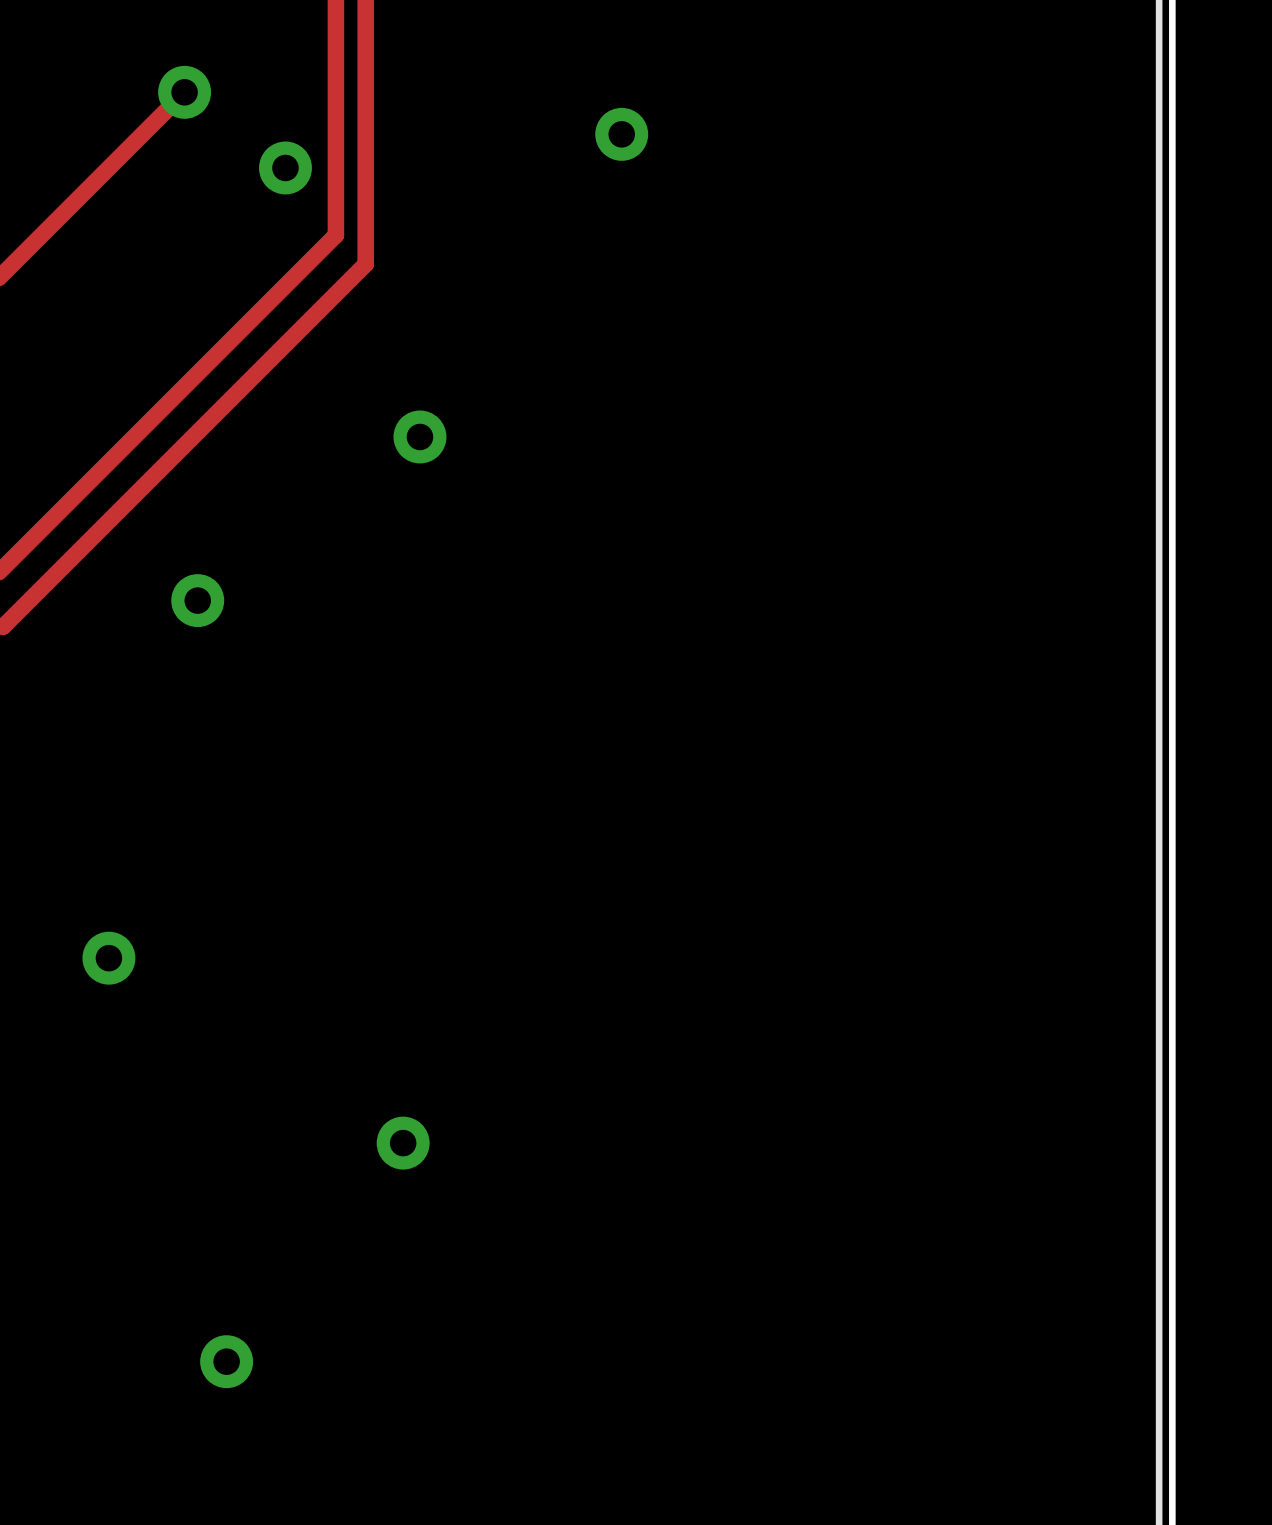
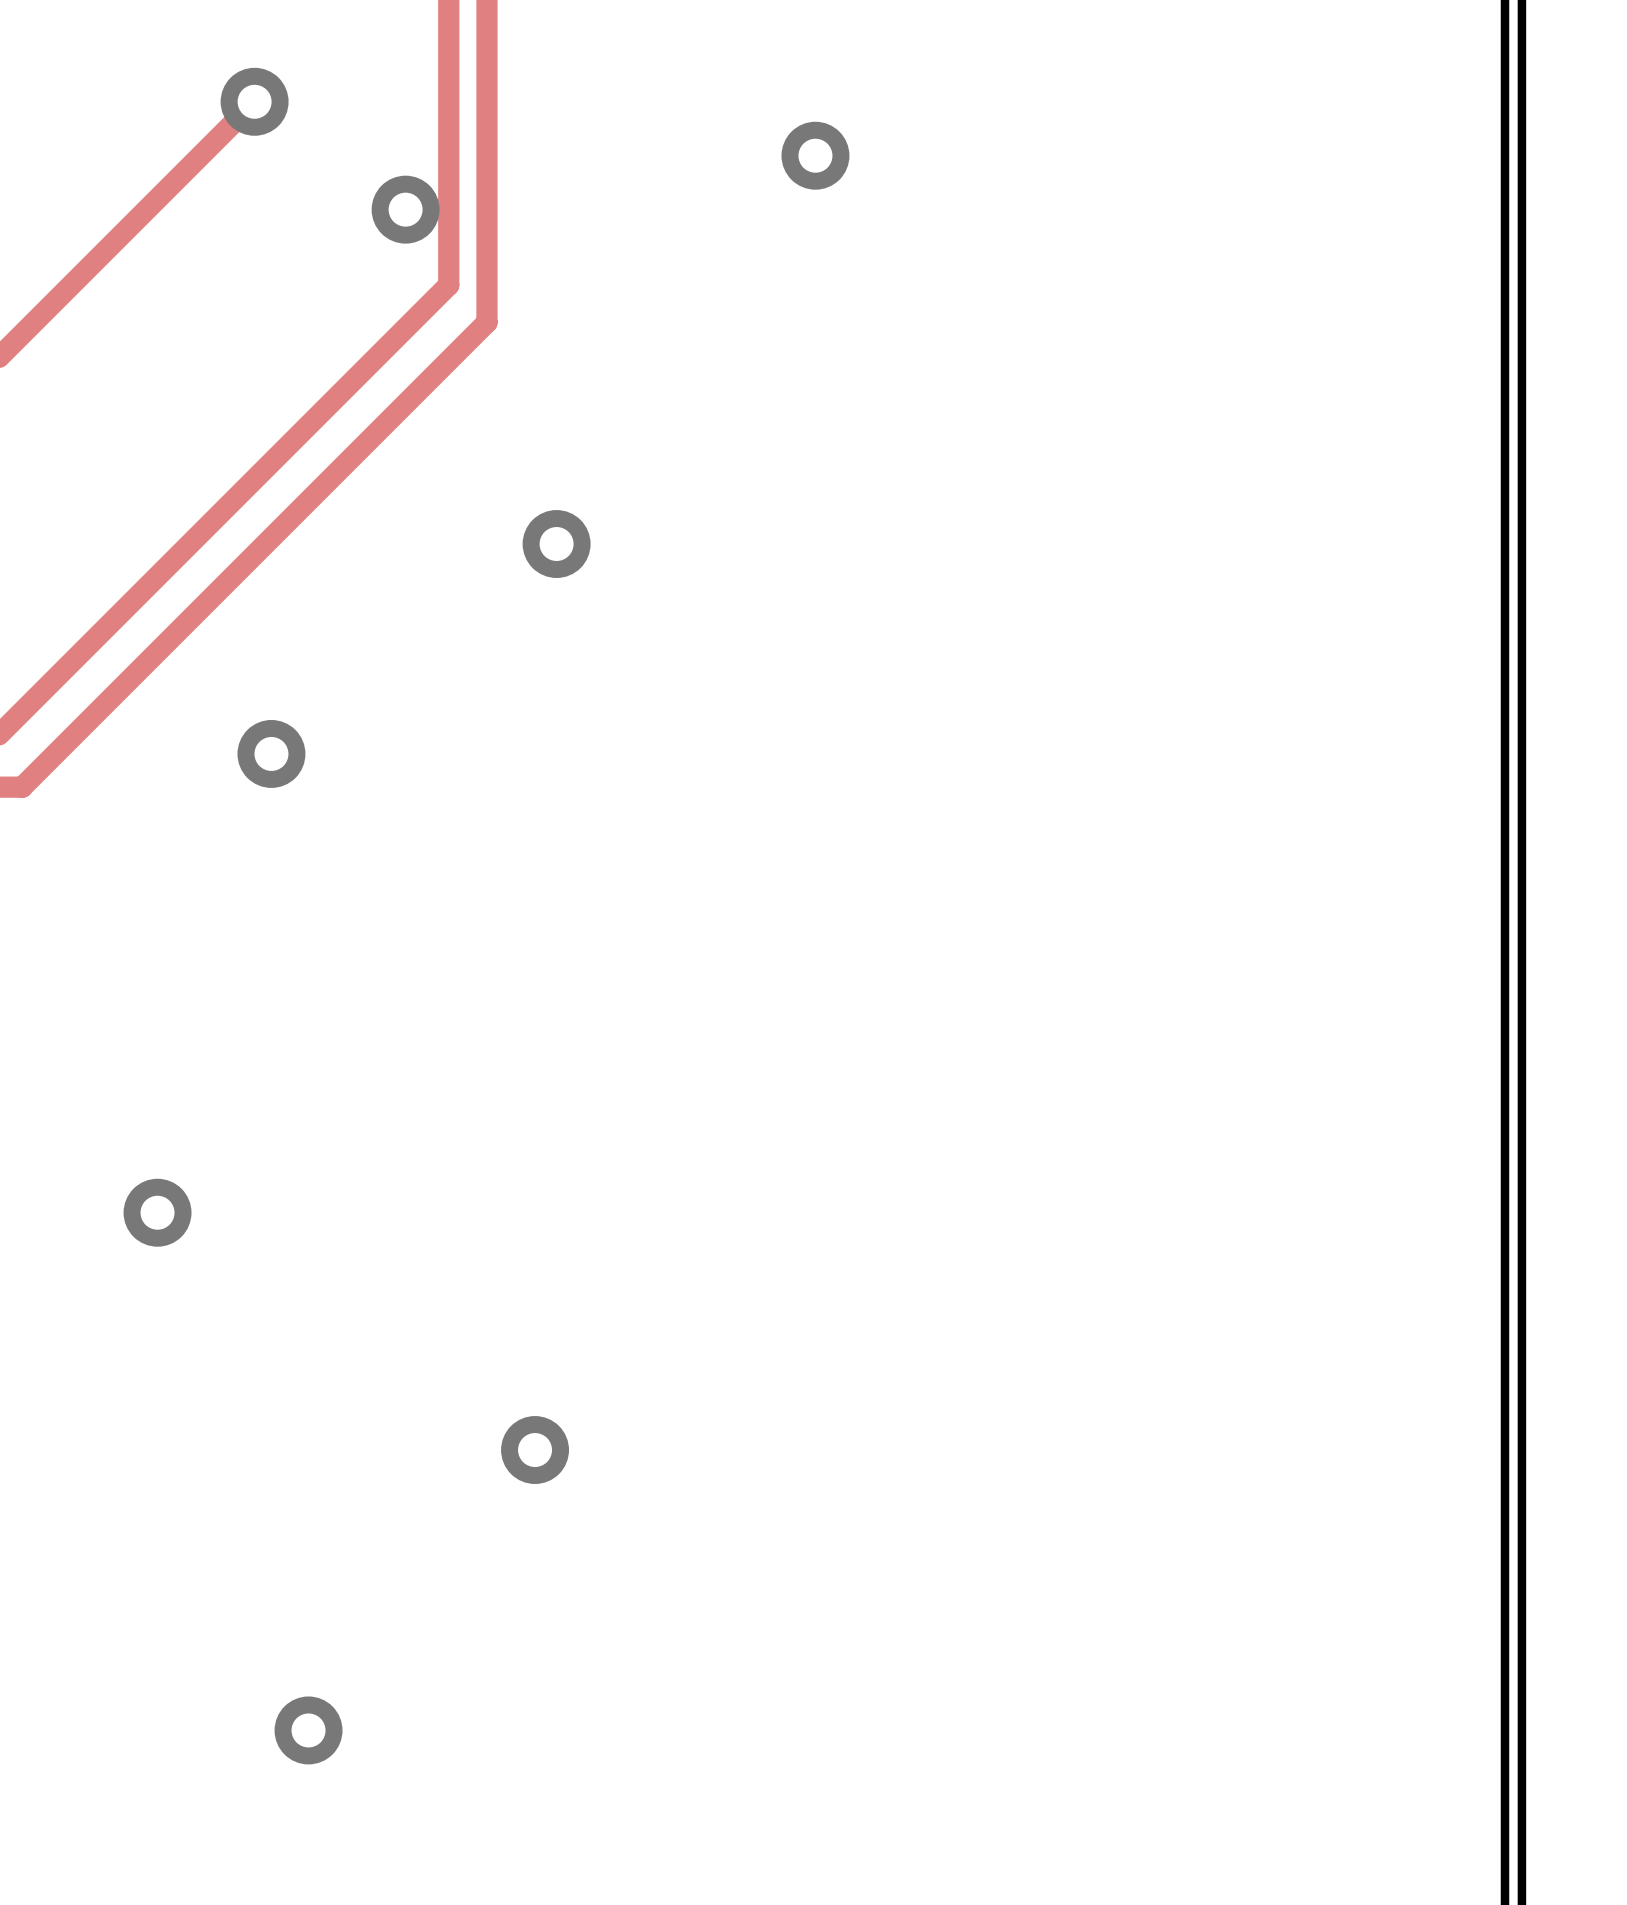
via position: (285, 167) -> (405, 209)

